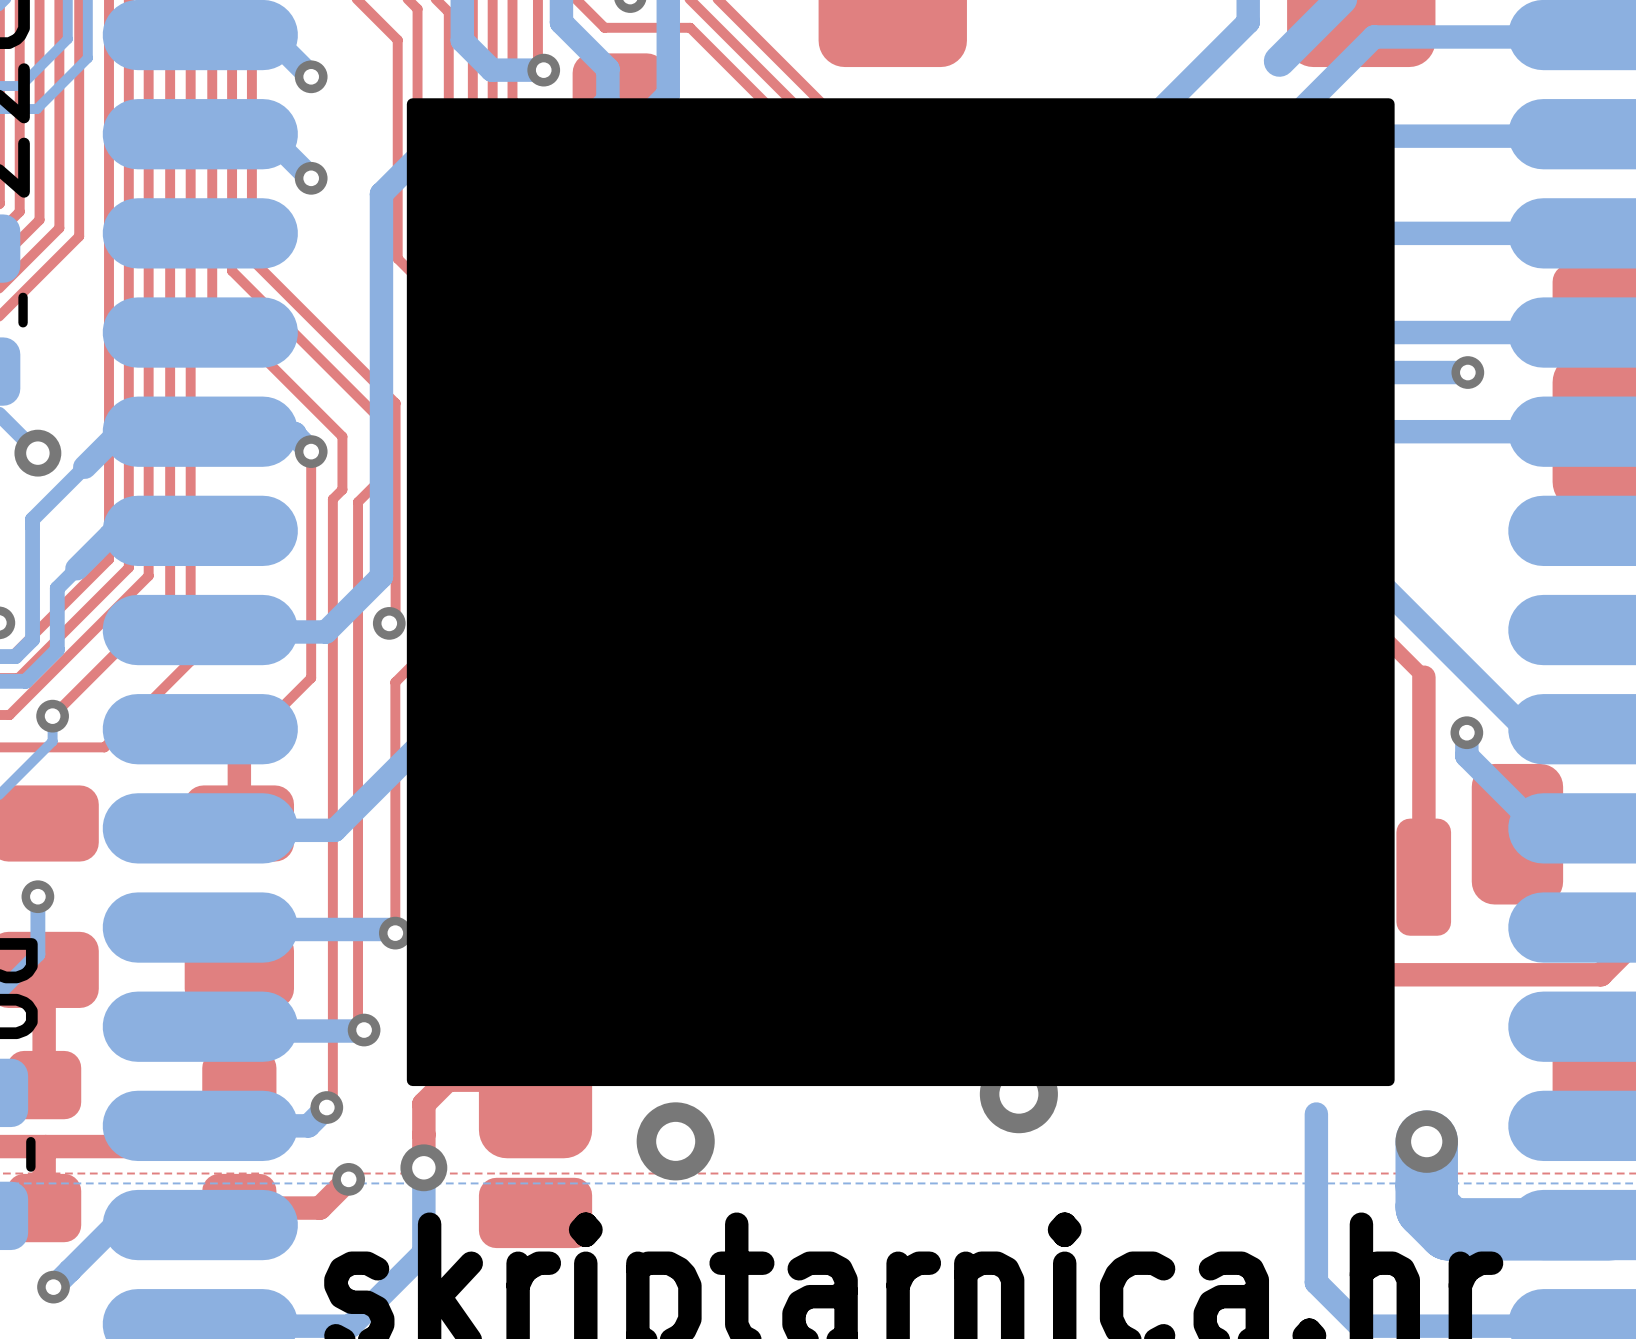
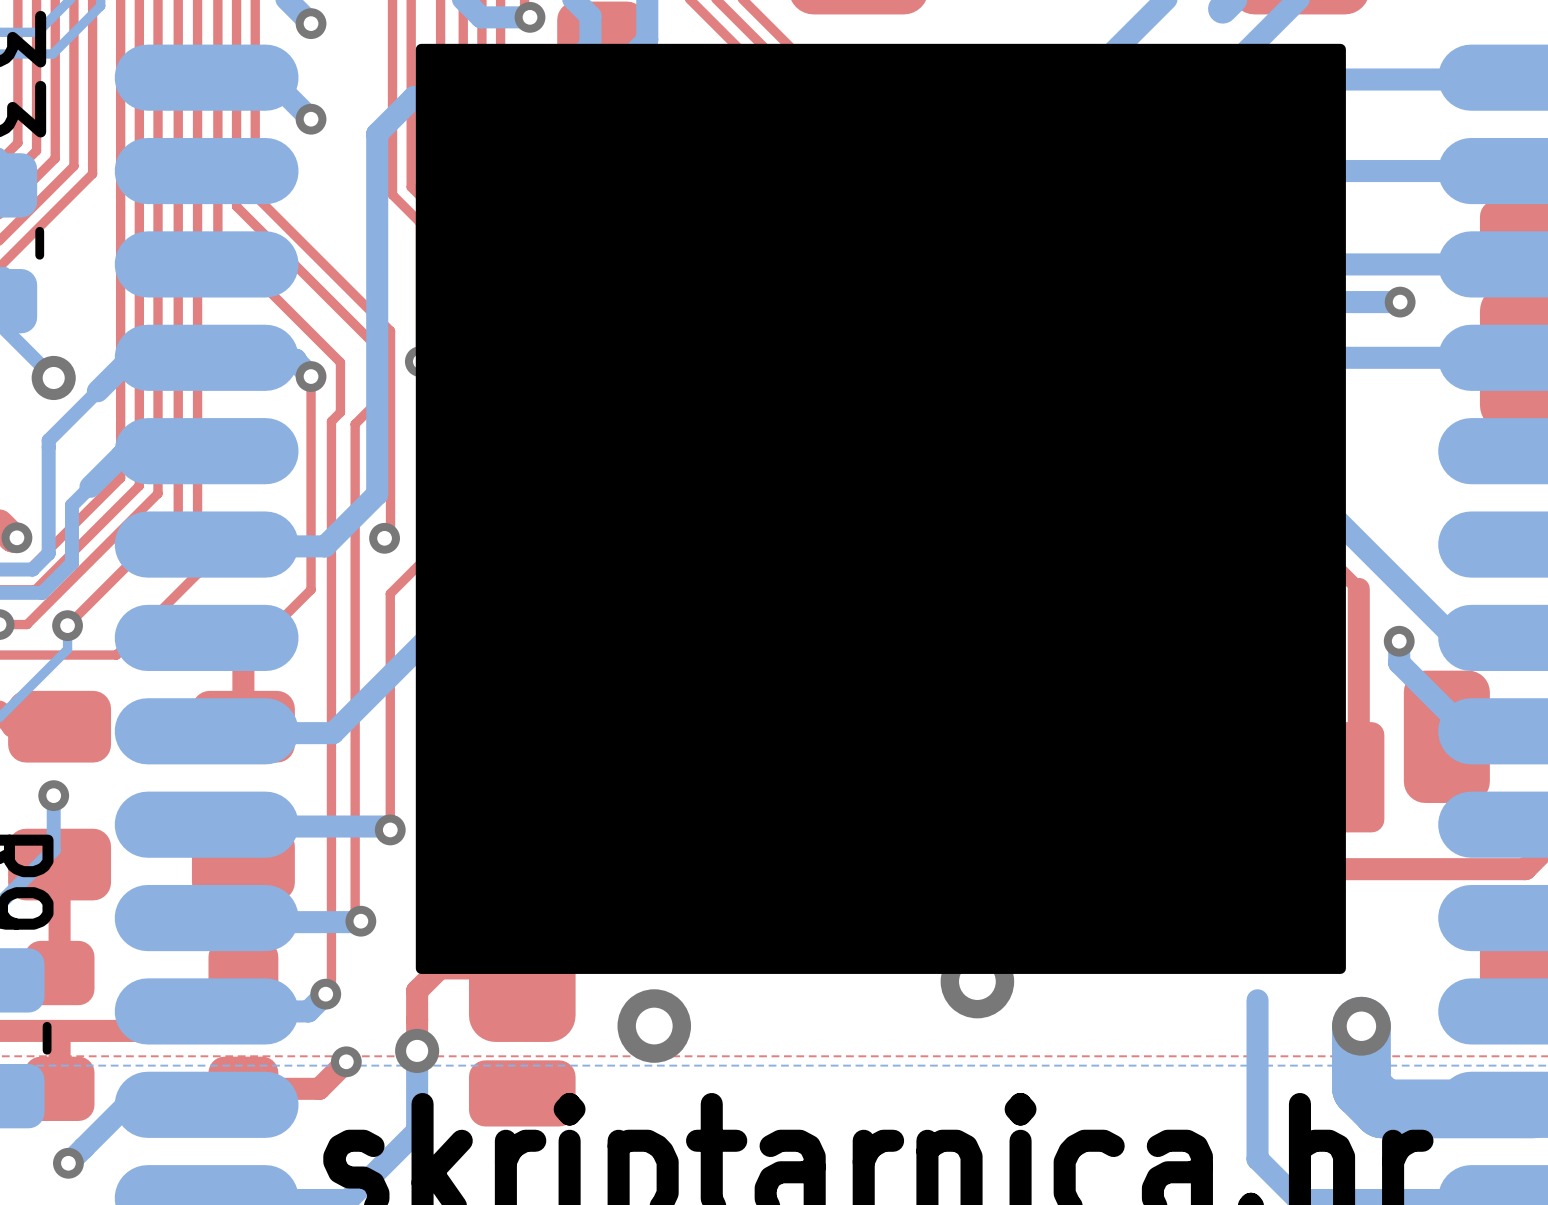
drawing position: (900, 592) -> (880, 508)

